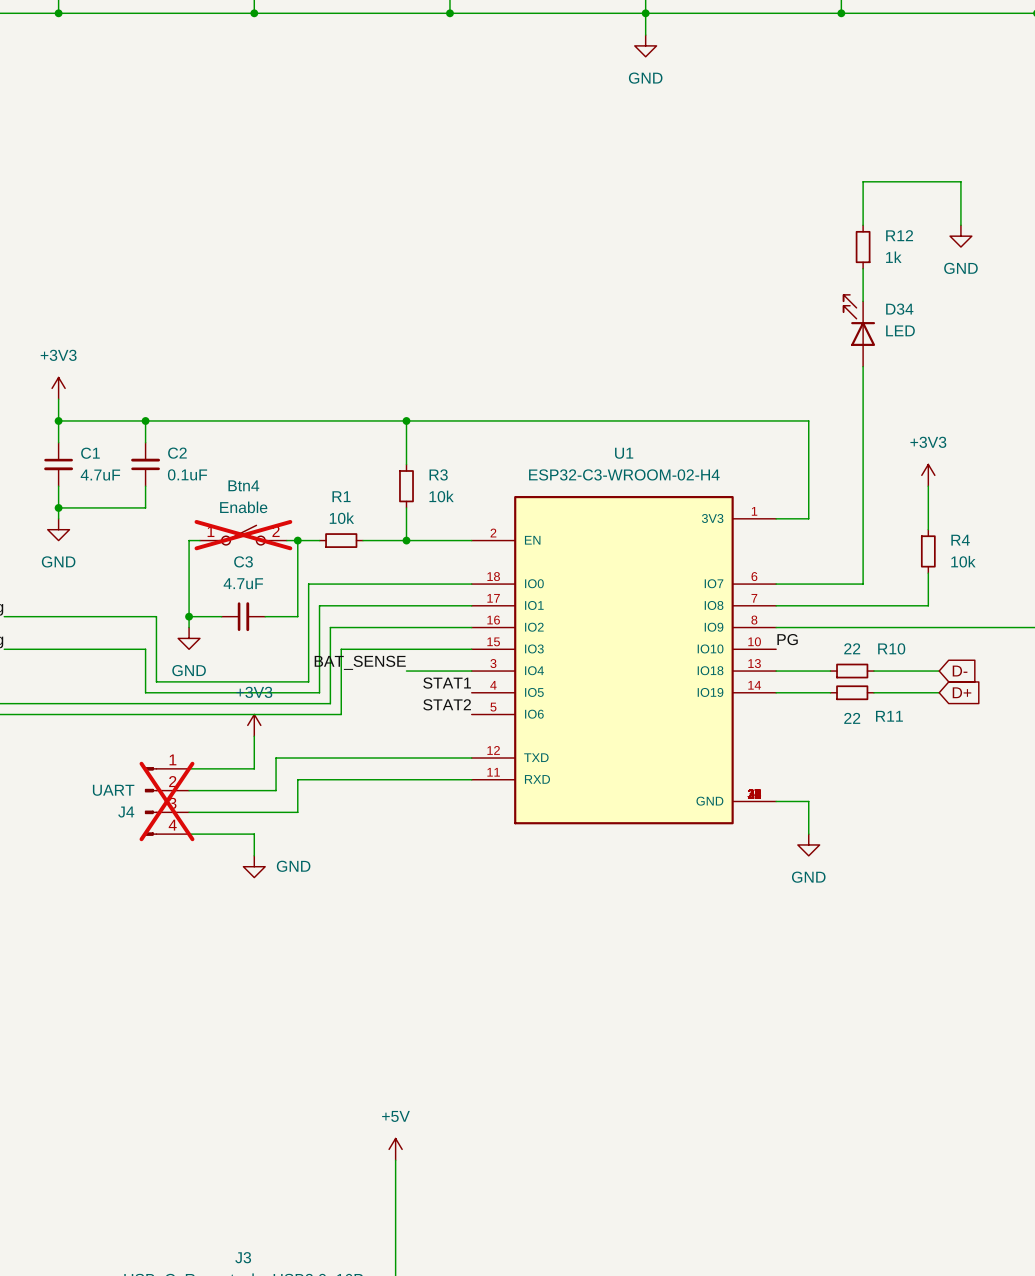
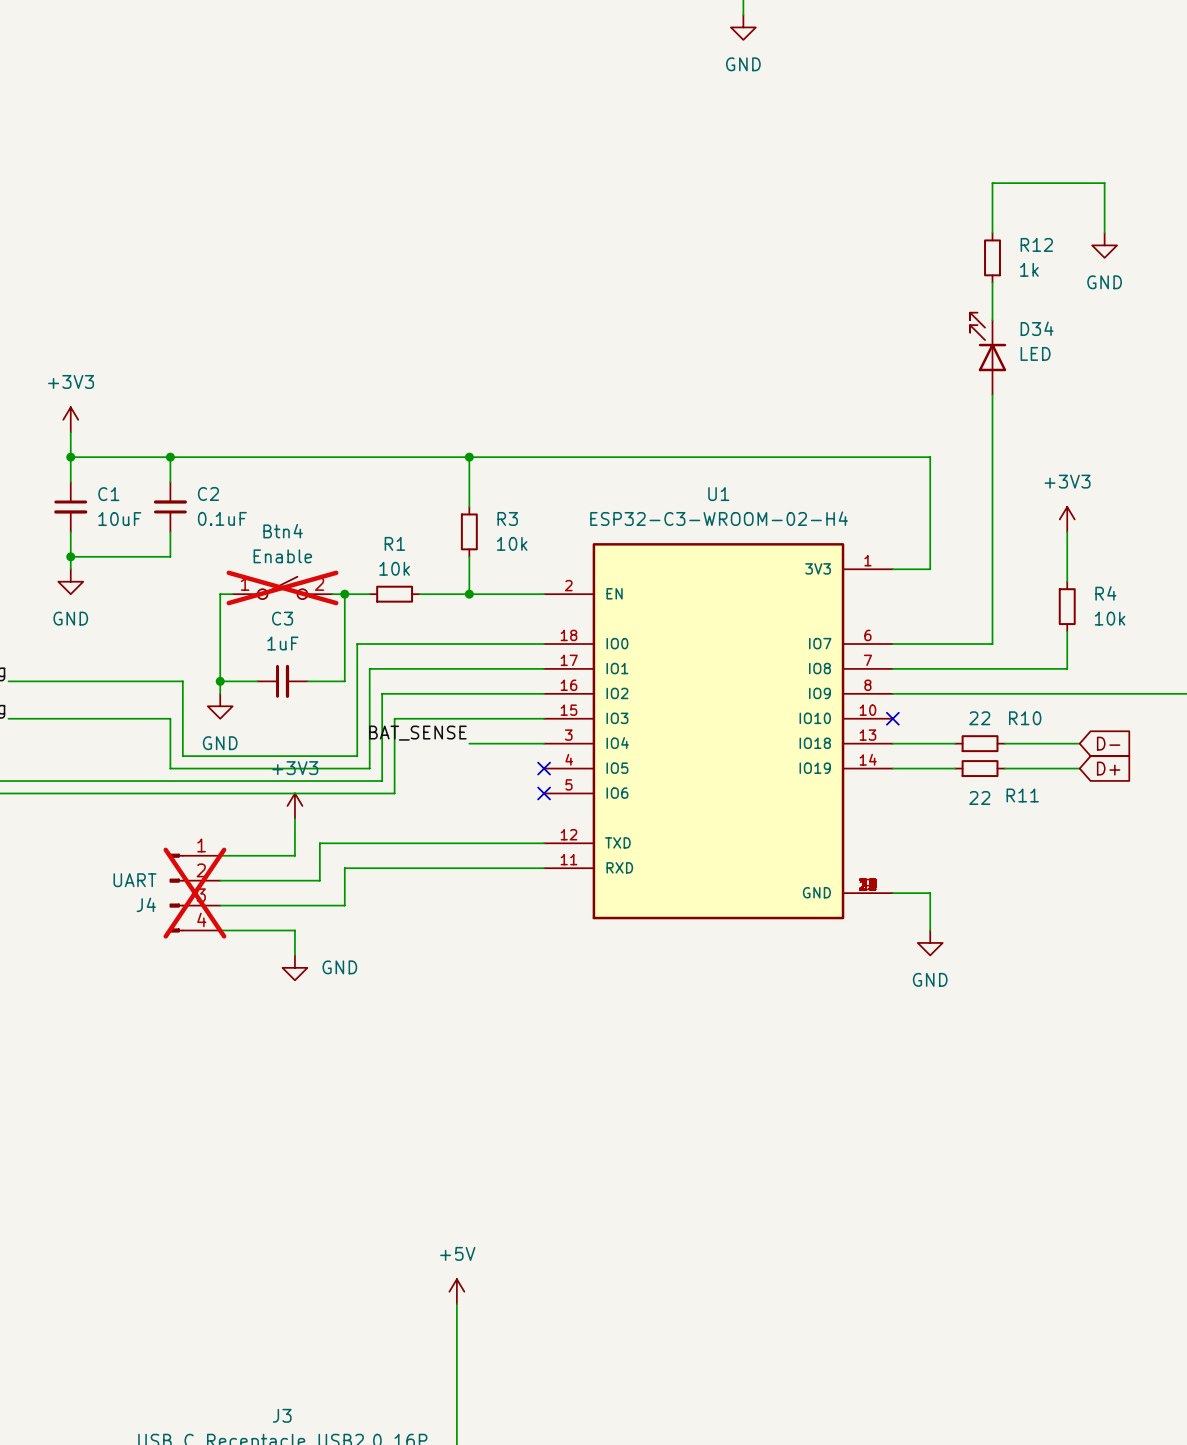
C1 value: 4.7uF (100, 475) -> 10uF (119, 519)
C3 value: 4.7uF (243, 583) -> 1uF (282, 643)
label: PG (787, 639) -> none
no-connect mark: none -> (892, 718)
label: STAT1 (447, 683) -> none
no-connect mark: none -> (544, 768)
label: STAT2 (447, 704) -> none
no-connect mark: none -> (544, 793)

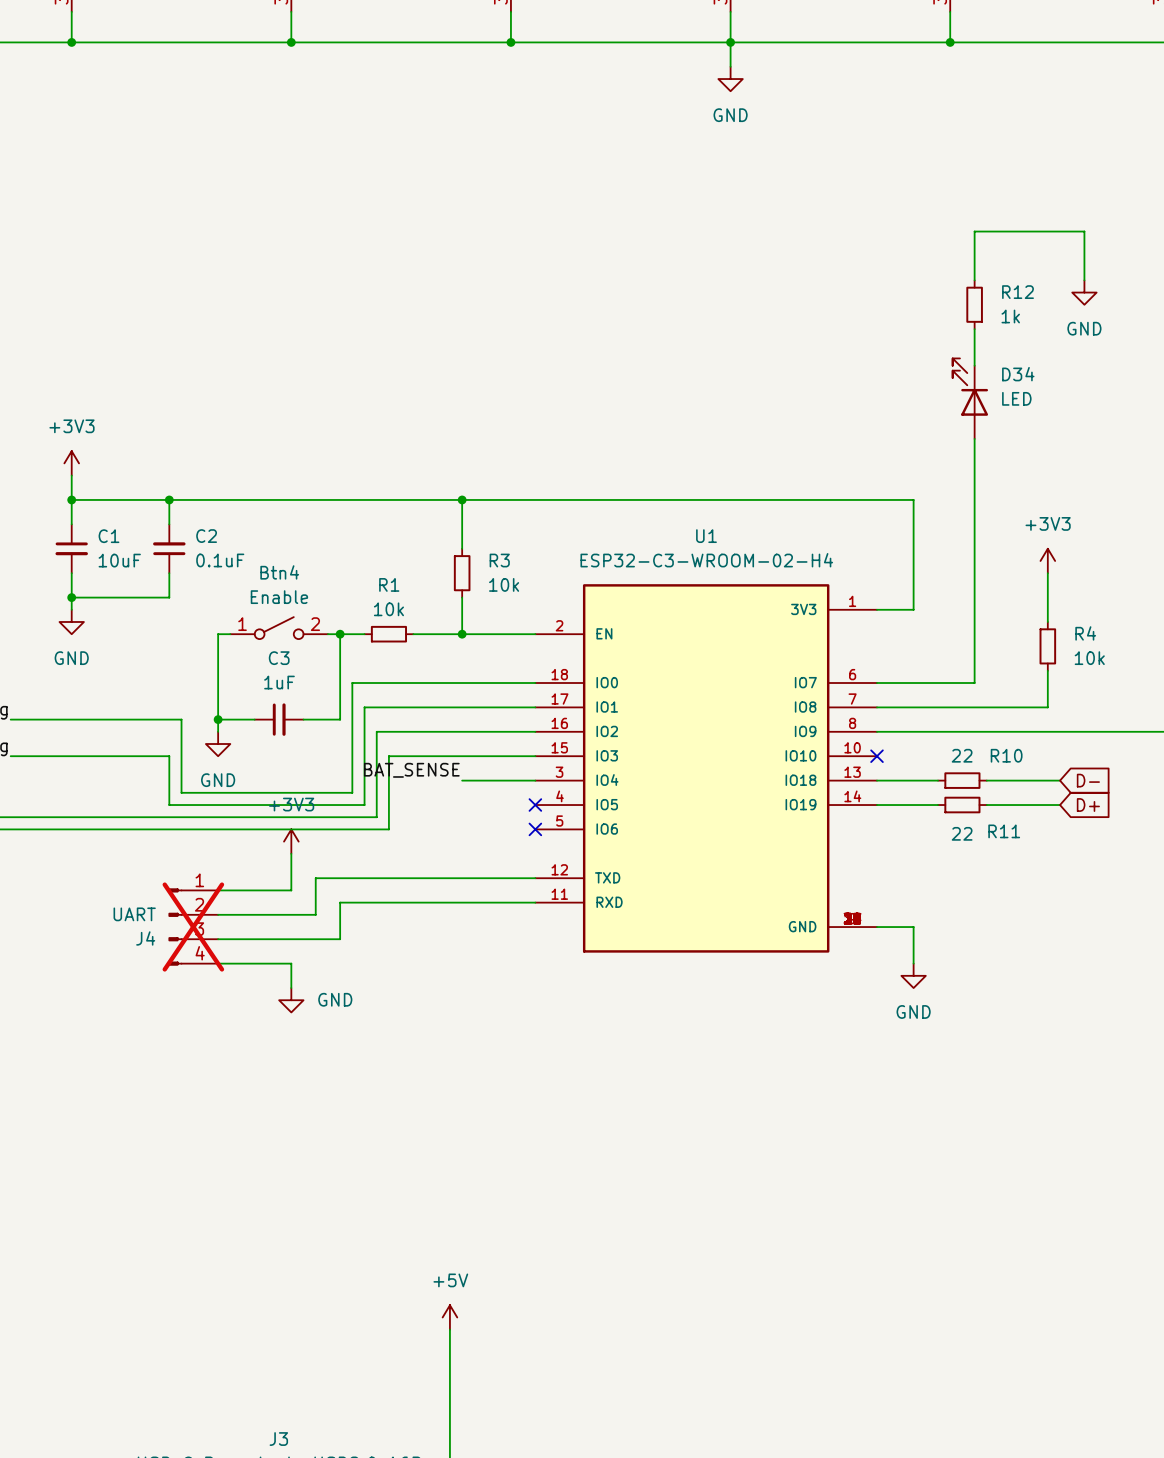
Btn4 do-not-place cross: (282, 587) -> none

